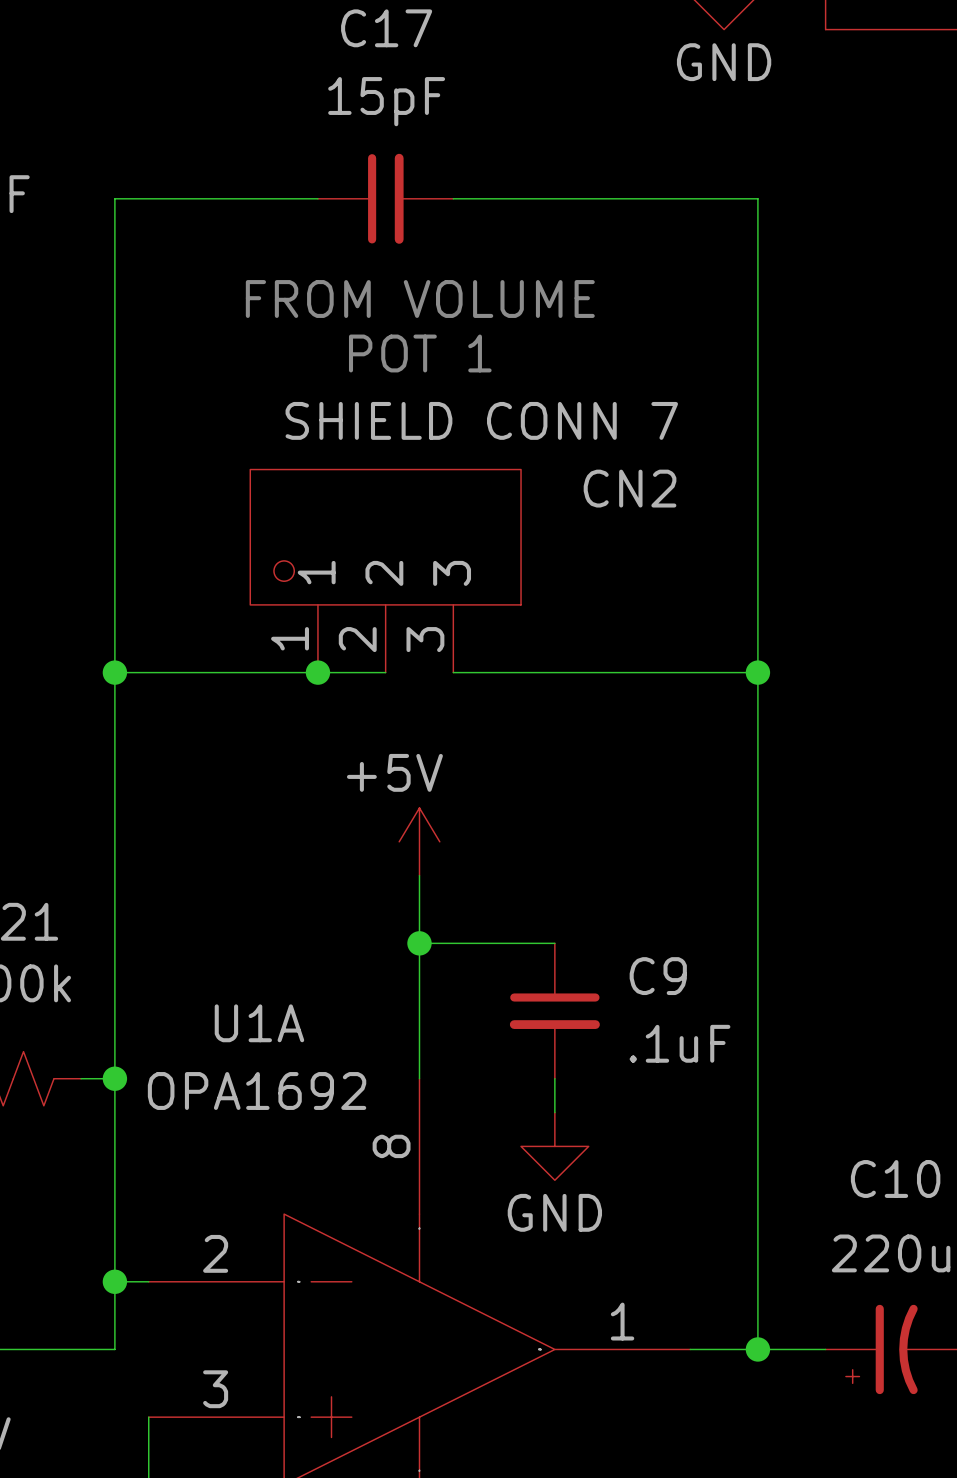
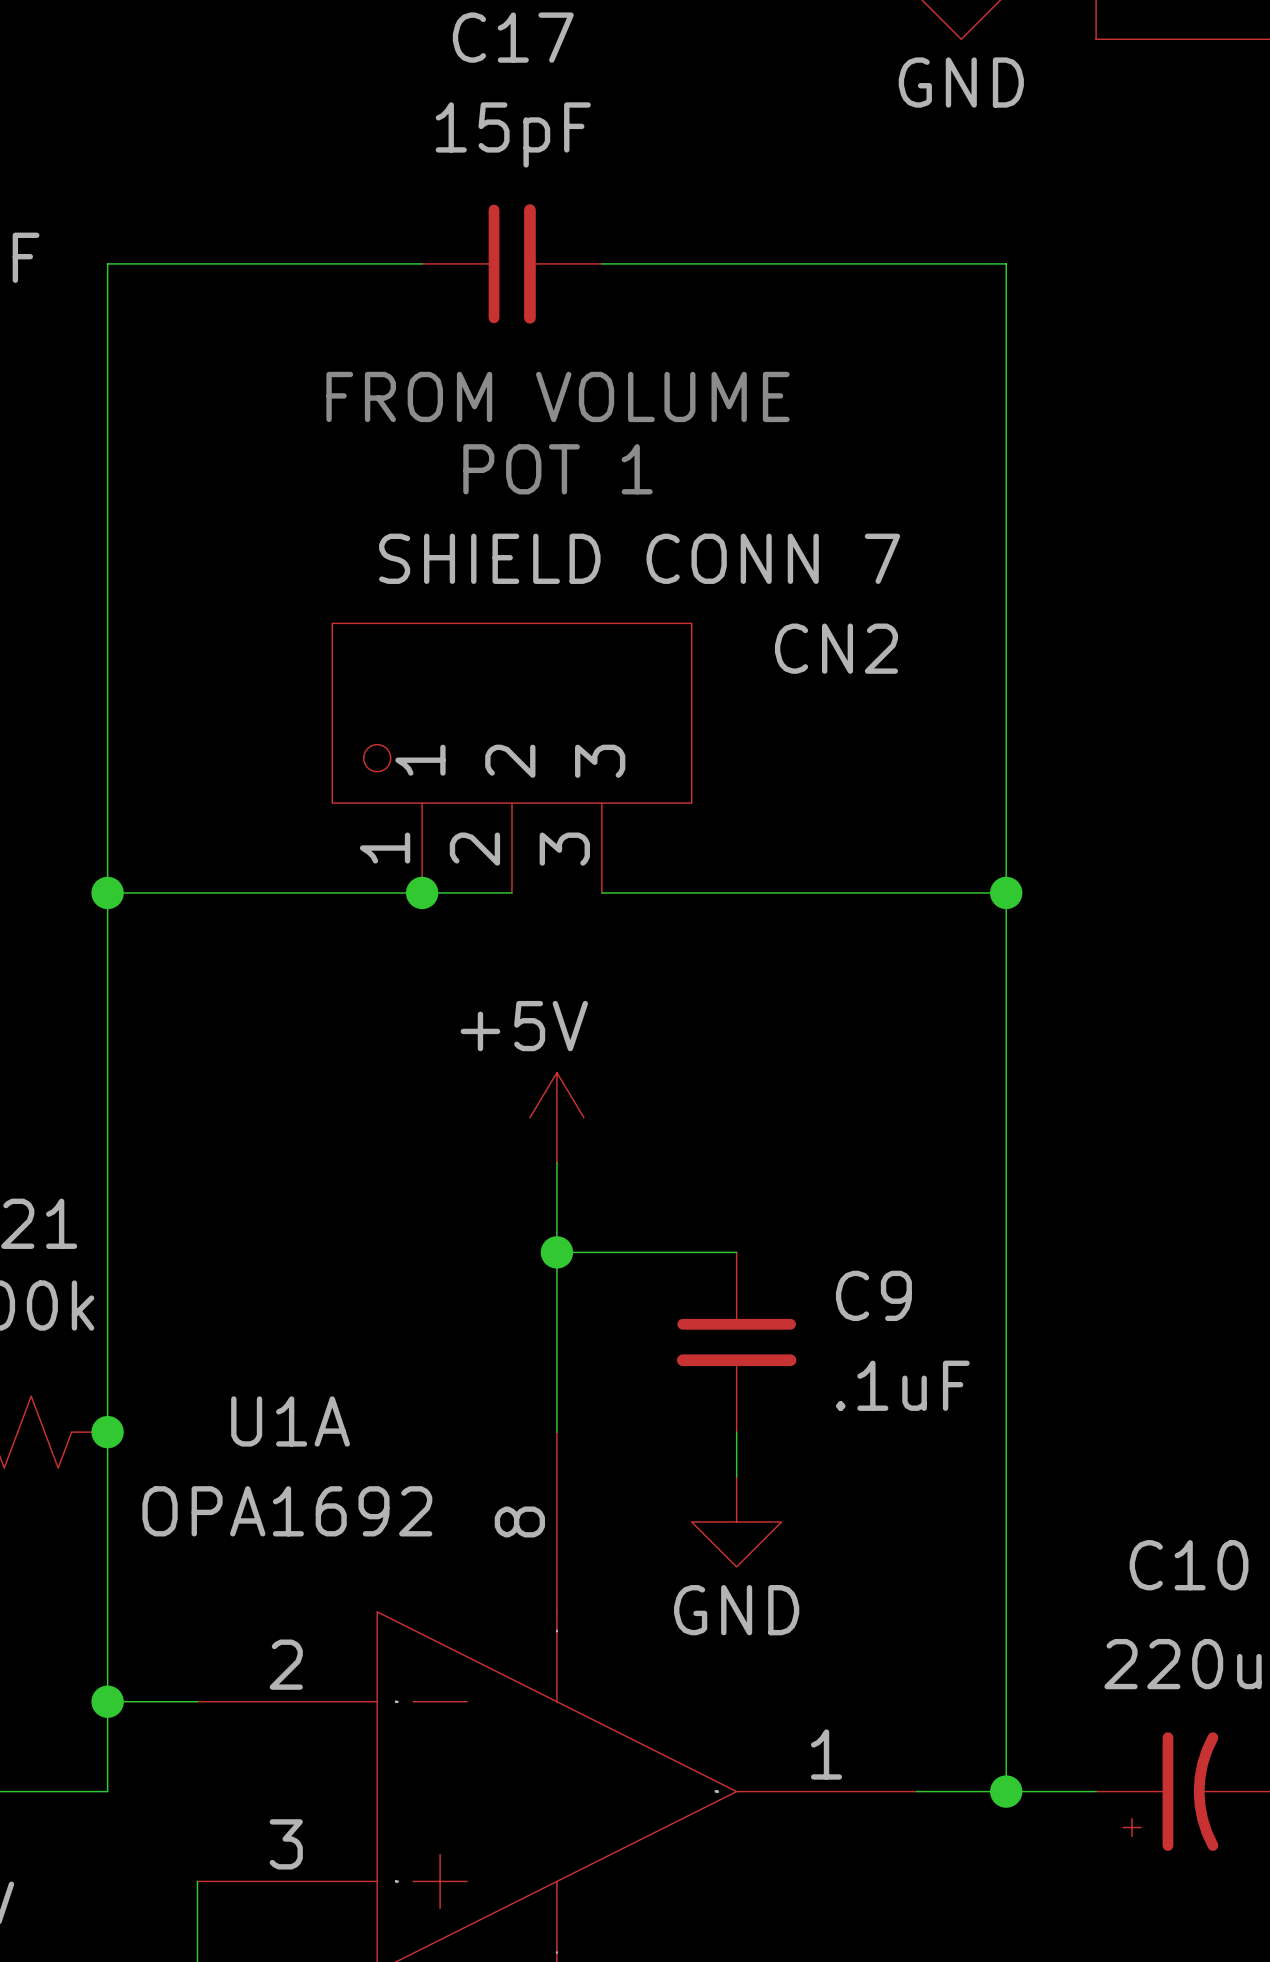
wire: (114, 198) (114, 1349) (81, 1349) -> (152, 263) (107, 263) (107, 1791)
wire: none -> (107, 892) (152, 892)
junction position: (114, 672) -> (107, 892)
U1A name position: U1A (259, 1023) -> U1A (290, 1421)
wire: (81, 1078) (114, 1078) -> (107, 1701) (152, 1701)
junction position: (114, 1078) -> (107, 1432)
U1A value position: OPA1692 (257, 1090) -> OPA1692 (287, 1511)
junction position: (114, 1281) -> (107, 1701)

